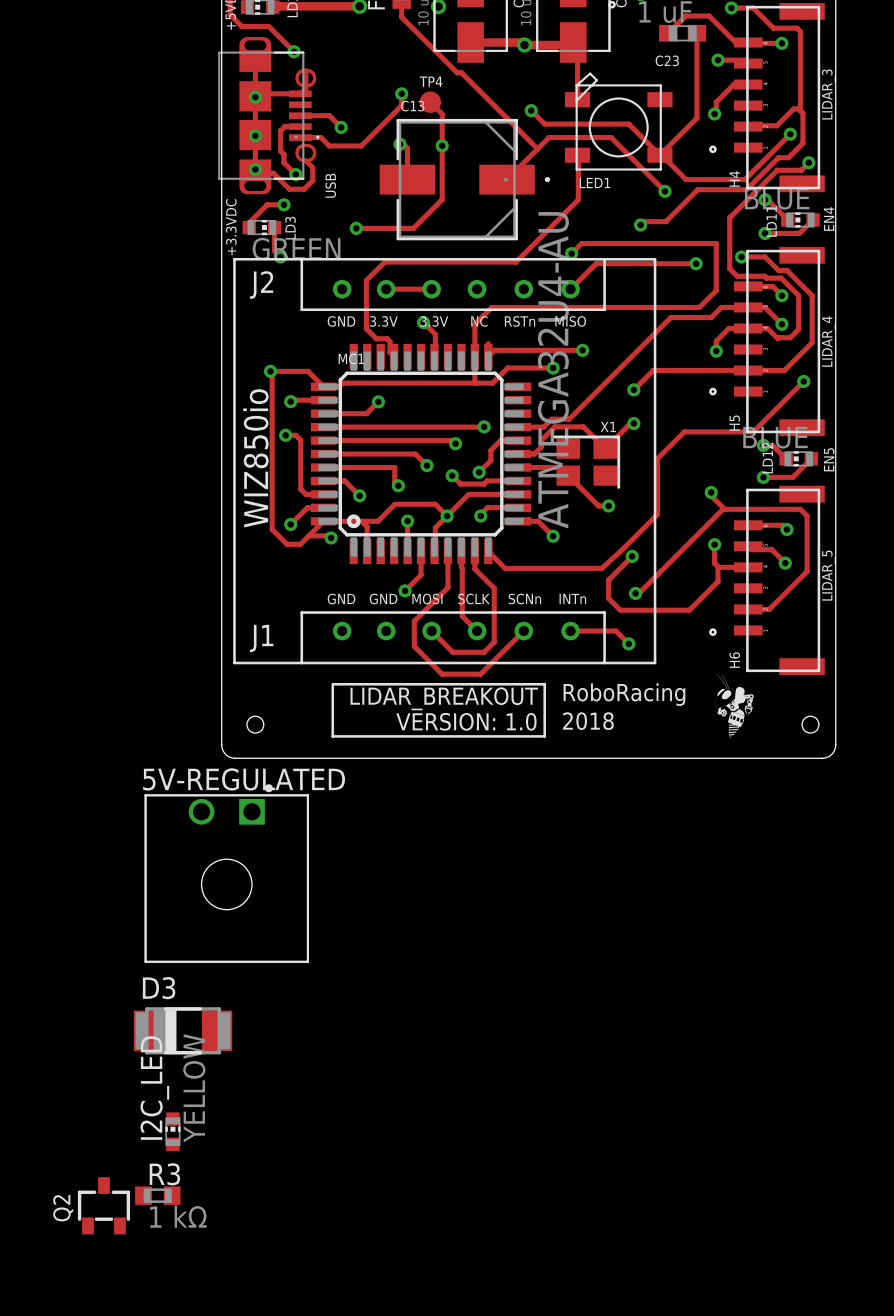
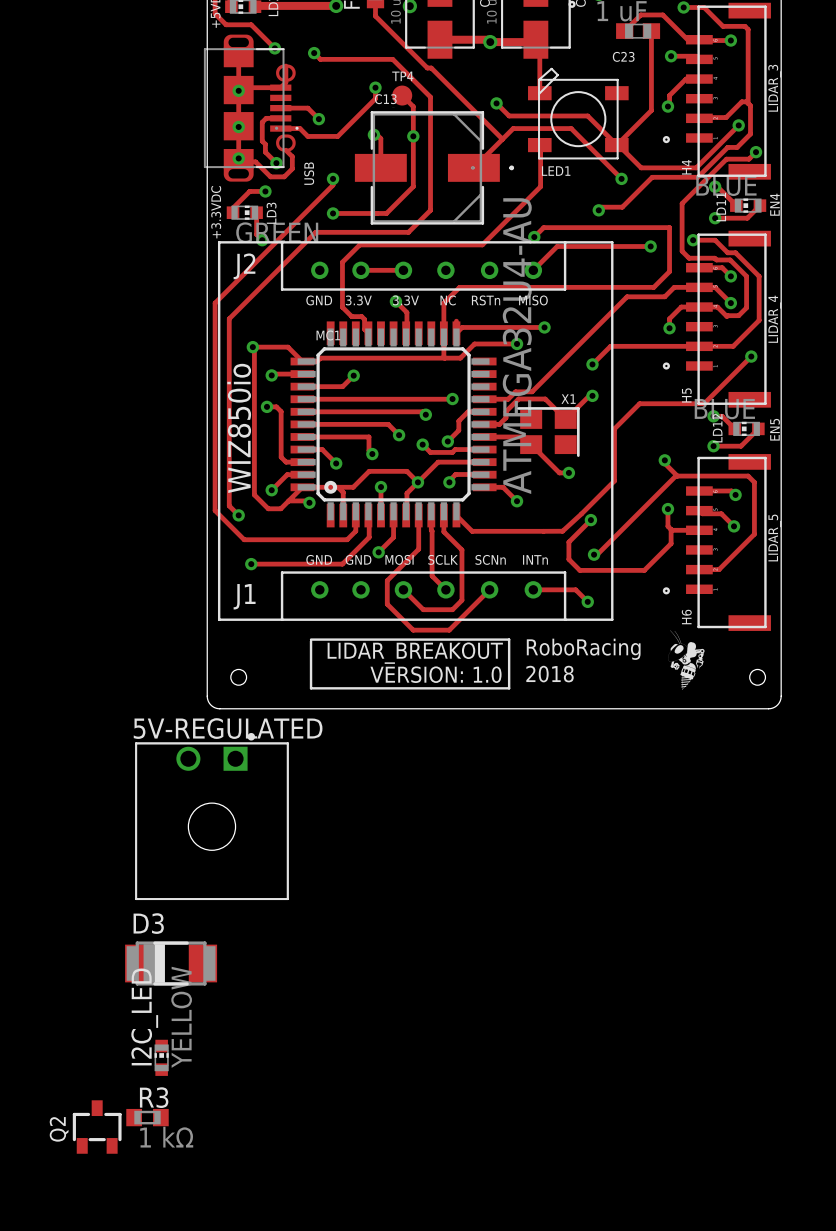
track: none -> (314, 53) (320, 59) (392, 59) (430, 97) (430, 210) (408, 232) (315, 232) (229, 318) (229, 505) (238, 515)
via: none -> (314, 53)
track: none -> (333, 178) (333, 185) (215, 303) (215, 510) (244, 539) (347, 539) (355, 531) (355, 515)
via: none -> (333, 178)
via: none -> (238, 515)
track: none -> (368, 515) (369, 537) (342, 564) (251, 564)
via: none -> (251, 564)

